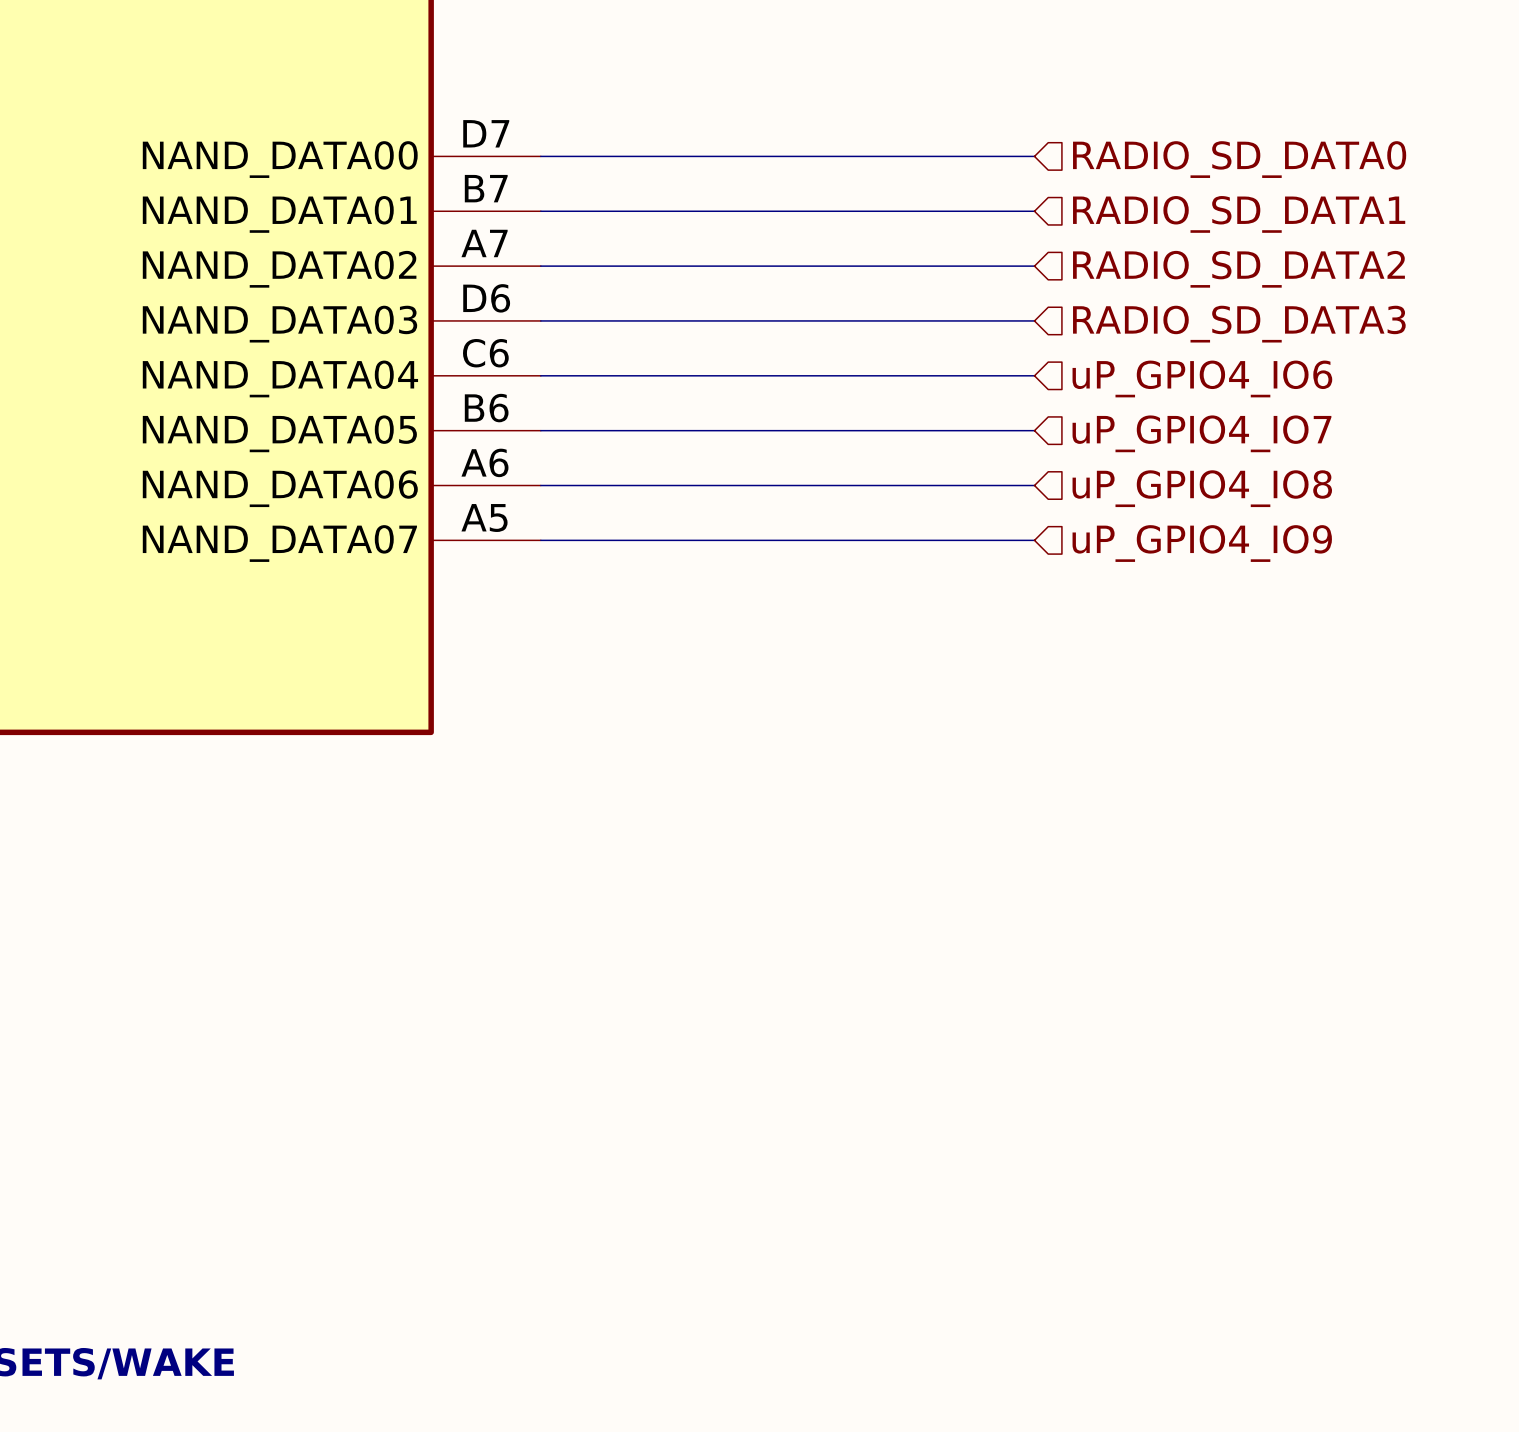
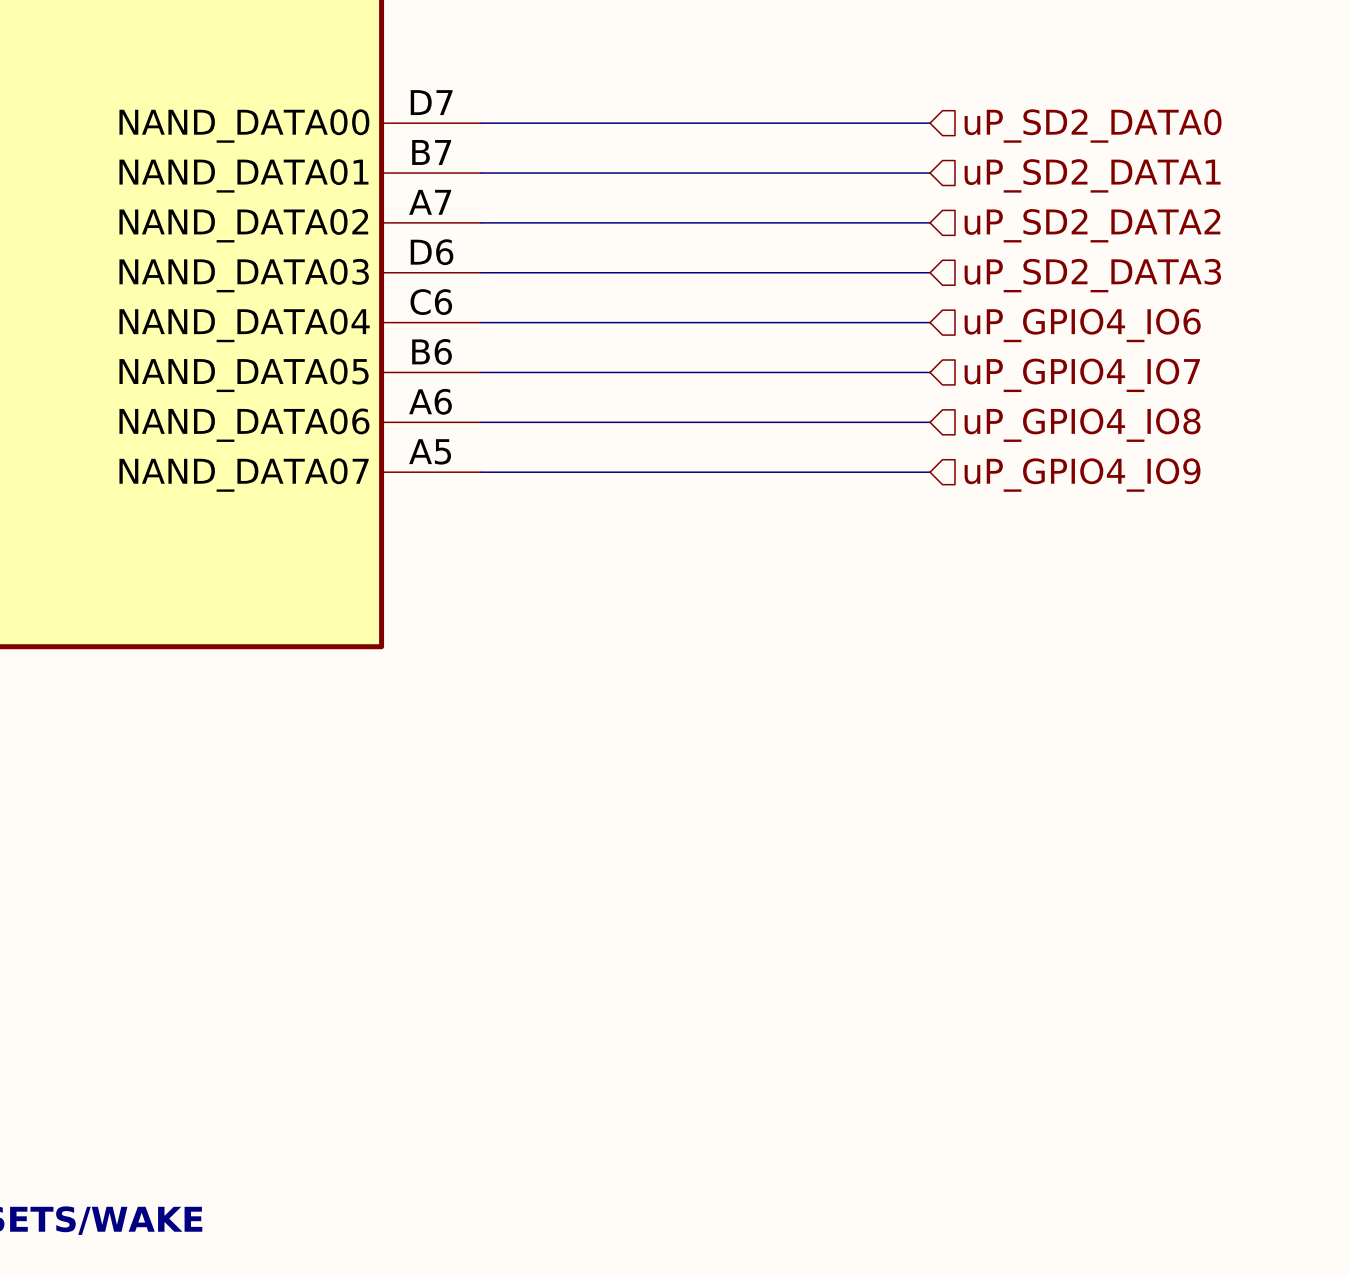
hierarchical label: RADIO_SD_DATA0 (1239, 159) -> uP_SD2_DATA0 (1093, 126)
hierarchical label: RADIO_SD_DATA1 (1239, 214) -> uP_SD2_DATA1 (1092, 175)
hierarchical label: RADIO_SD_DATA2 (1238, 269) -> uP_SD2_DATA2 (1092, 225)
hierarchical label: RADIO_SD_DATA3 (1239, 324) -> uP_SD2_DATA3 (1092, 275)

